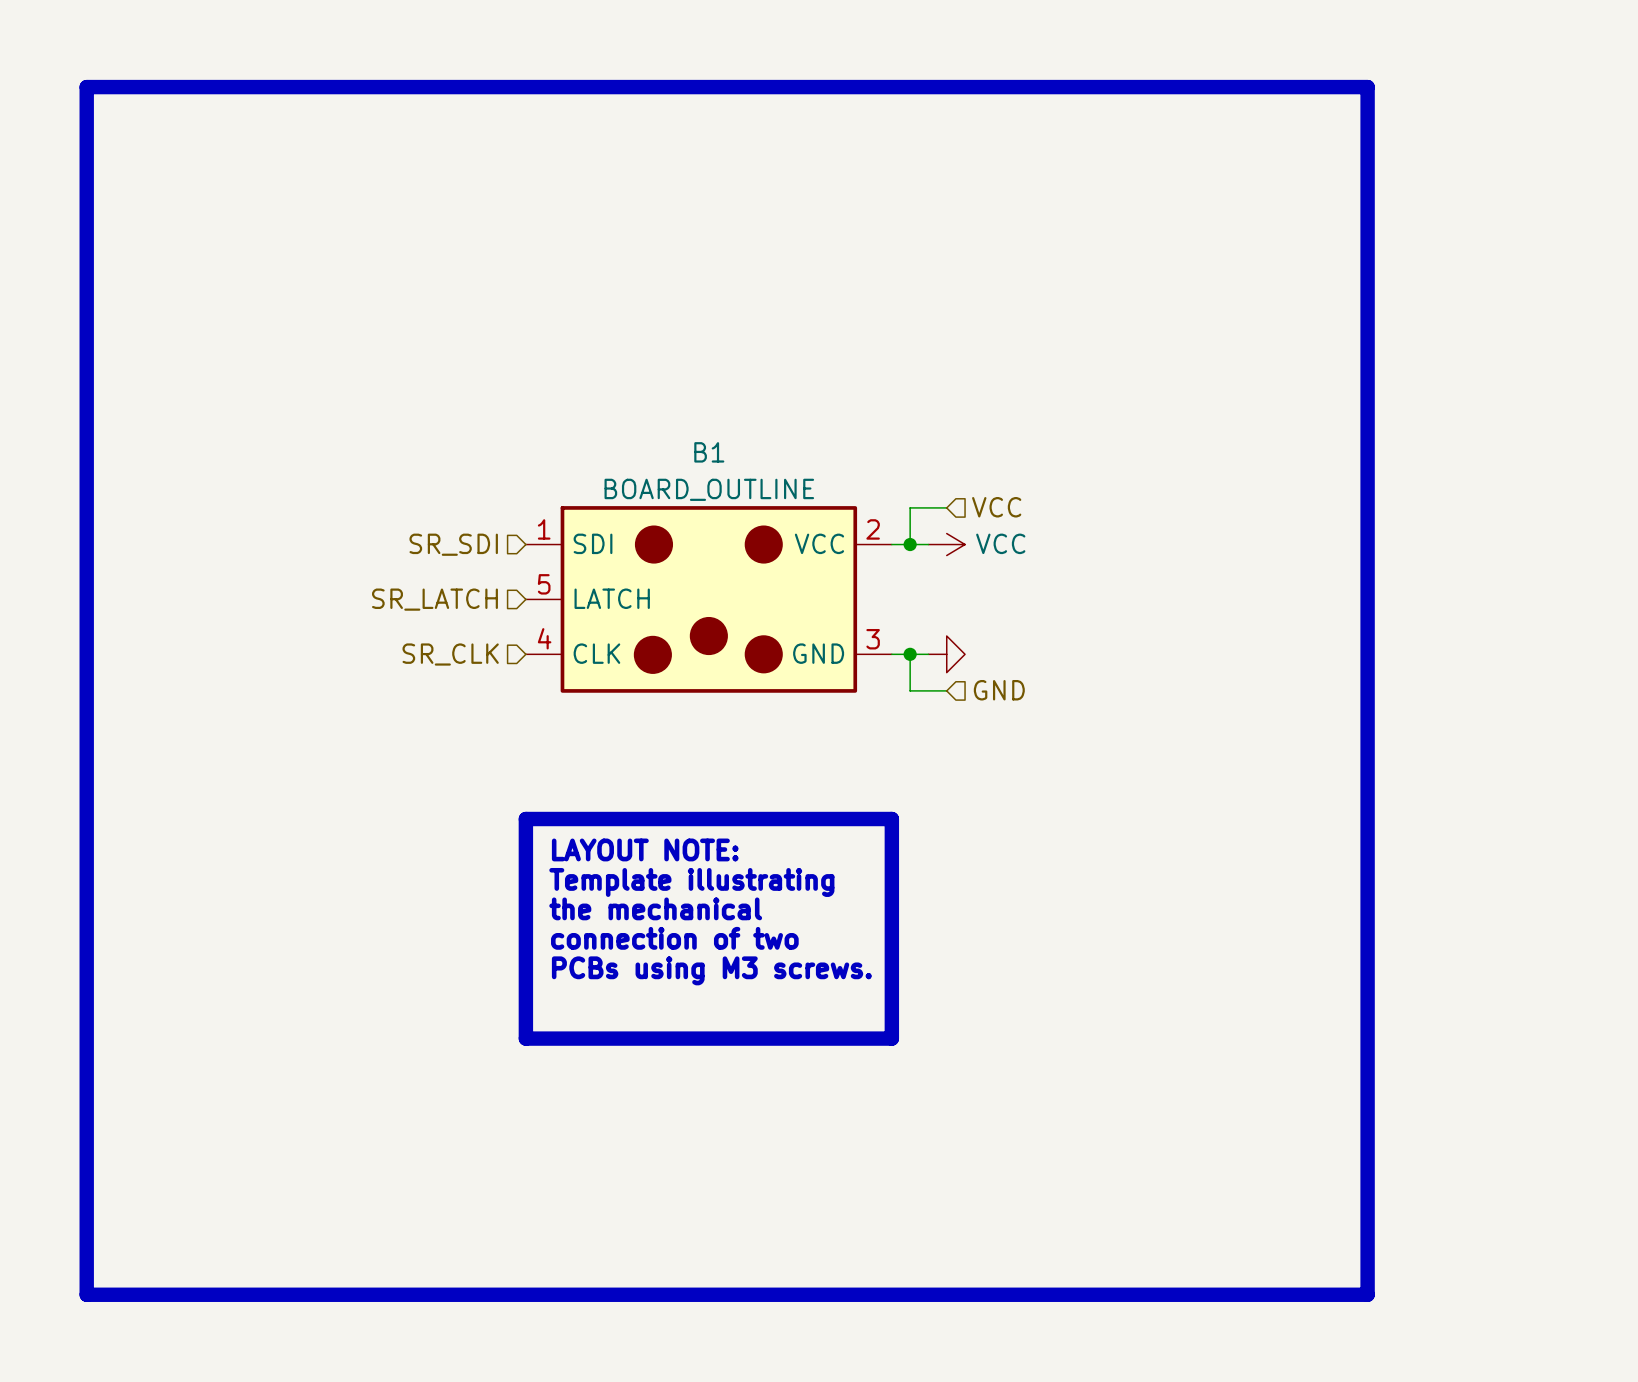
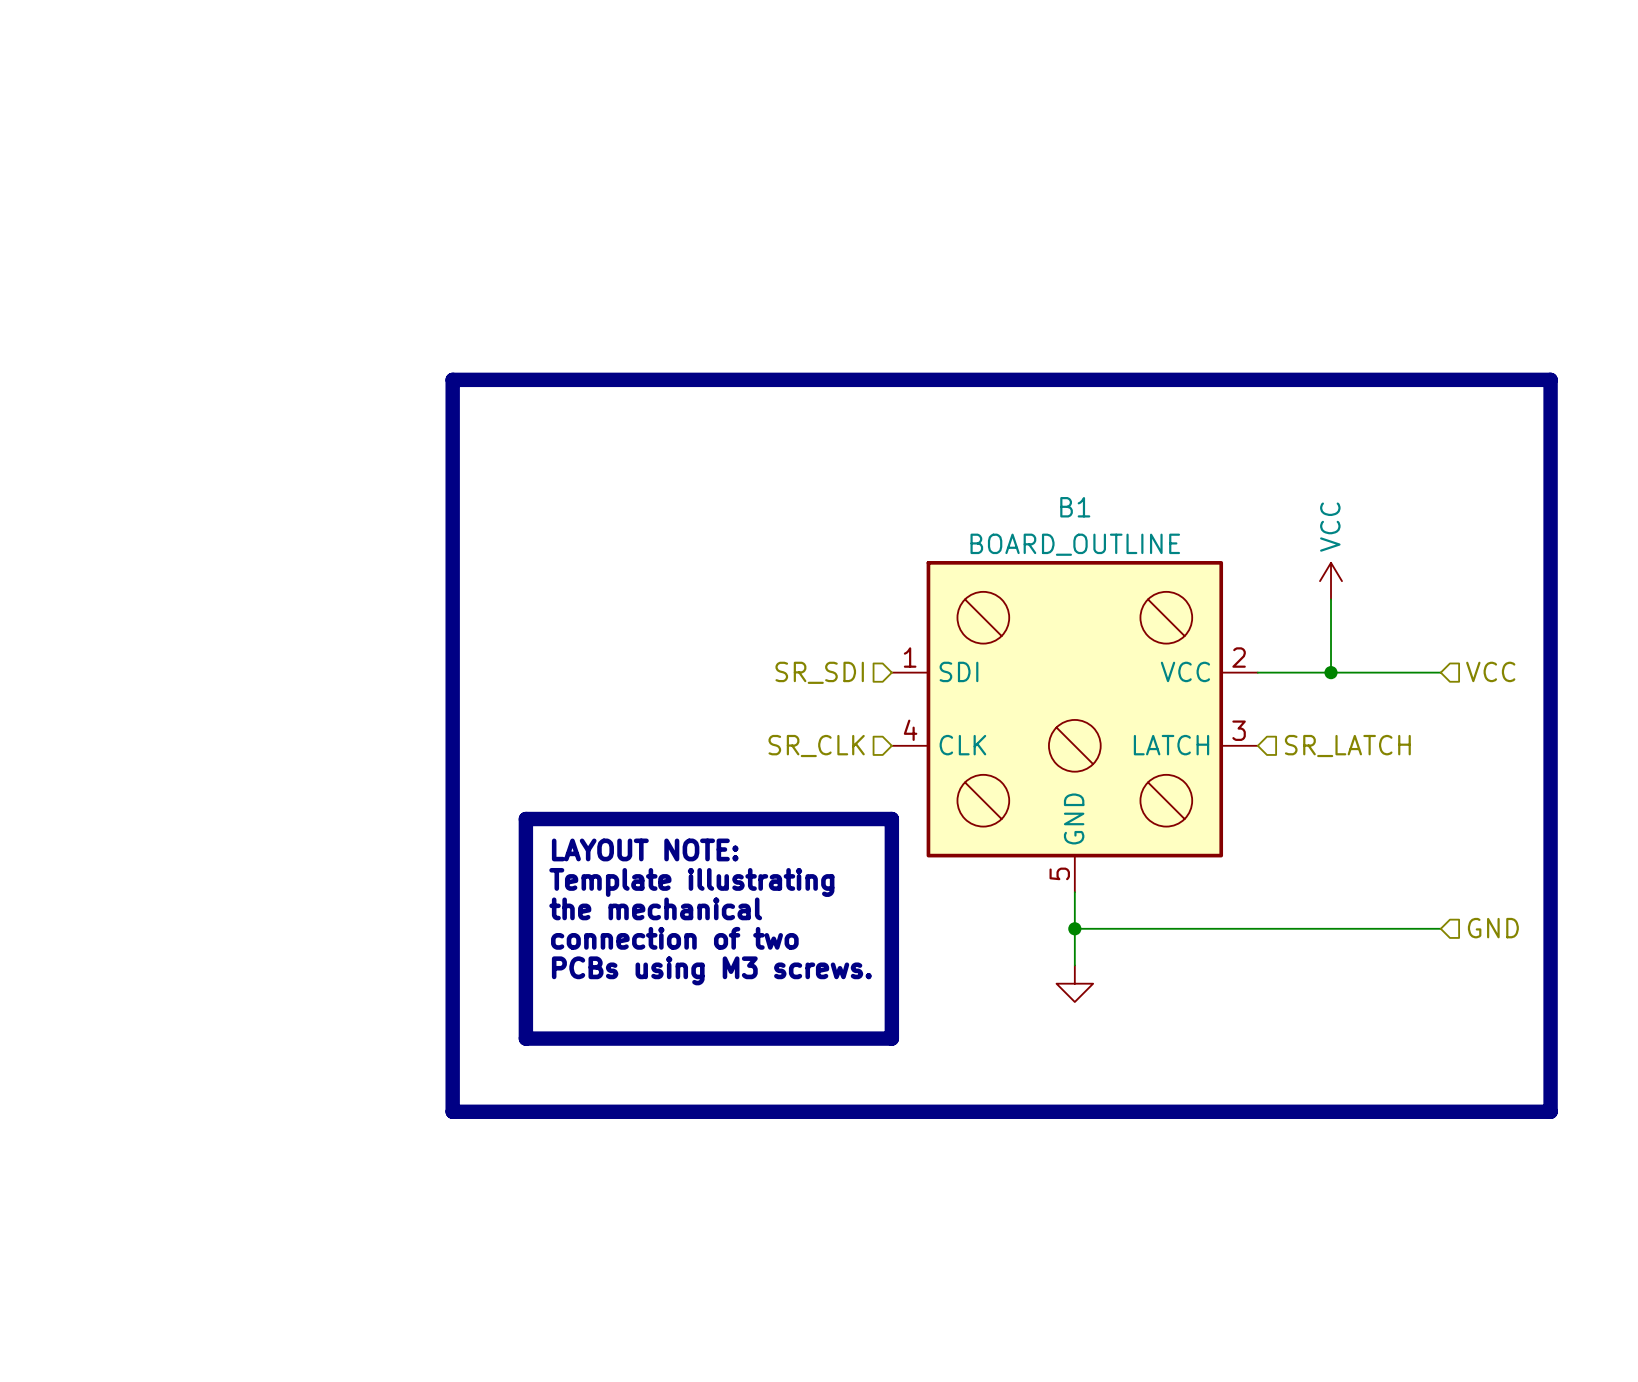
line: (86, 87) (1367, 87) (1367, 1294) (86, 1294) (86, 87) -> none
line: none -> (452, 379) (1550, 379) (1550, 1111) (452, 1111) (452, 379)
B1 name position: B1 (709, 452) -> B1 (1075, 507)
B1 value position: BOARD_OUTLINE (709, 489) -> BOARD_OUTLINE (1075, 544)
B1 symbol: [525, 506, 892, 693] -> [891, 561, 1258, 893]
wire: (946, 507) (910, 507) (910, 544) -> none
hierarchical label: VCC (996, 507) -> none
hierarchical label: SR_SDI (453, 544) -> none
wire: (891, 544) (928, 544) -> none
junction: (910, 544) -> none
power symbol: VCC (946, 544) -> none
power symbol: none -> VCC (1331, 581)
hierarchical label: SR_LATCH (434, 599) -> none
wire: none -> (1331, 599) (1331, 672)
hierarchical label: SR_CLK (450, 654) -> none
wire: (891, 654) (928, 654) -> none
wire: (910, 654) (910, 690) (946, 690) -> none
junction: (910, 654) -> none
power symbol rotation: 0° (946, 654) -> 90° clockwise (1074, 983)
power symbol position: (946, 654) -> (1074, 983)
hierarchical label: none -> VCC (1490, 671)
hierarchical label: none -> SR_SDI (819, 672)
wire: none -> (1257, 672) (1440, 672)
junction: none -> (1331, 672)
hierarchical label: GND (999, 690) -> none
hierarchical label: none -> SR_CLK (816, 746)
hierarchical label: none -> SR_LATCH (1347, 746)
wire: none -> (1074, 892) (1074, 965)
wire: none -> (1074, 928) (1440, 928)
junction: none -> (1074, 928)
hierarchical label: none -> GND (1493, 928)

